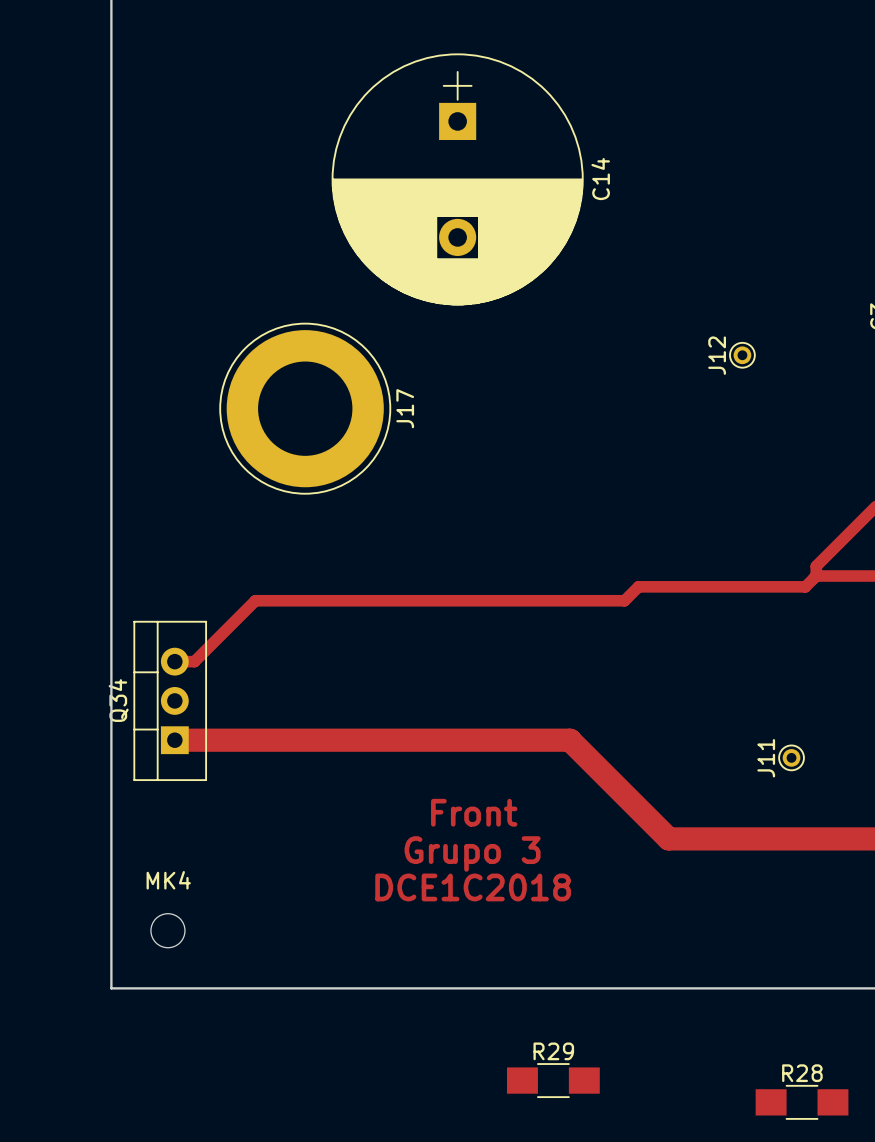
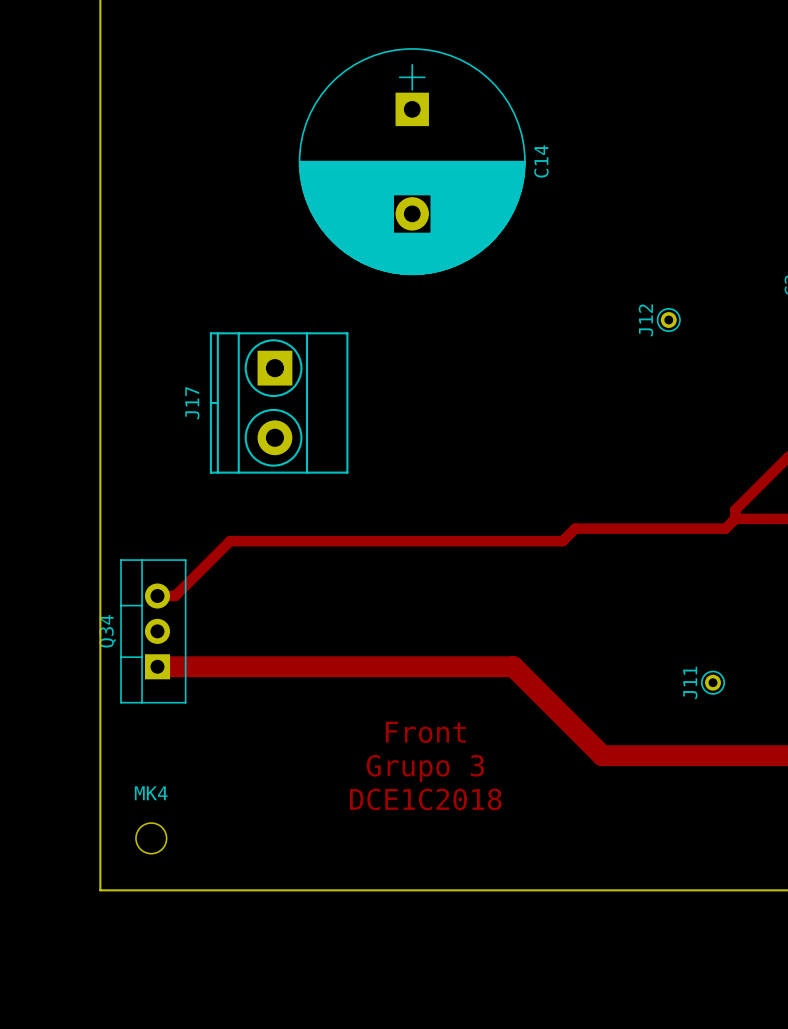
J17 footprint: [219, 322, 392, 495] -> [209, 332, 349, 474]
J17 name position: J17 (405, 408) -> J17 (192, 403)
R29: (553, 1080) -> none
R28: (802, 1102) -> none

